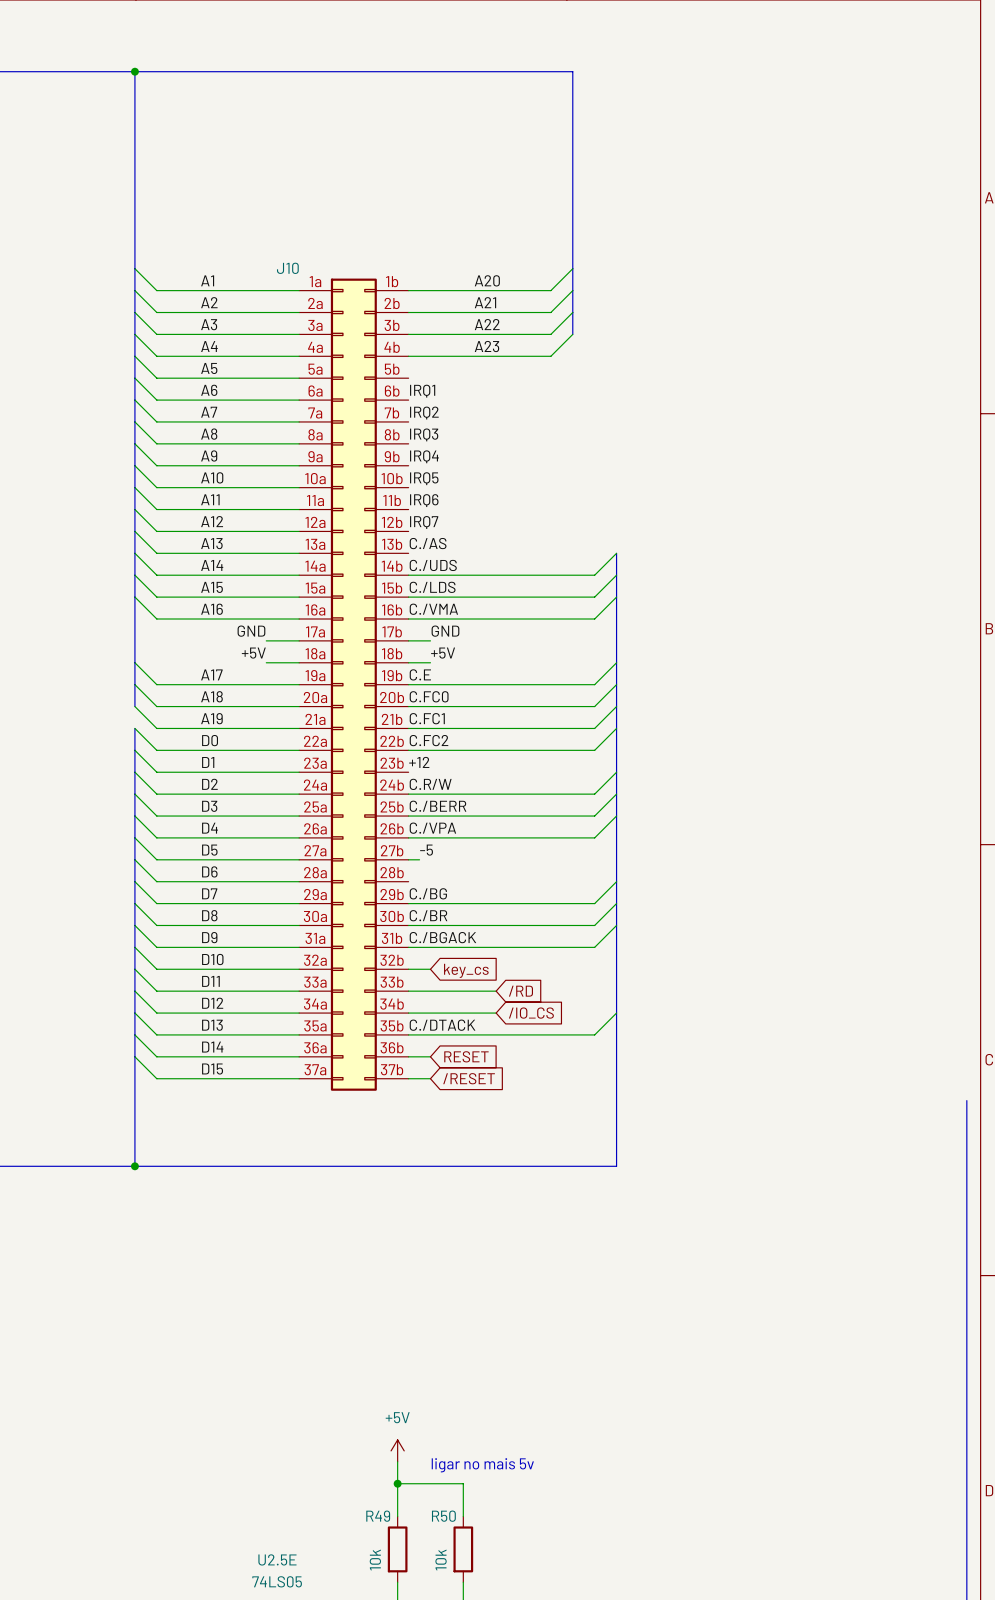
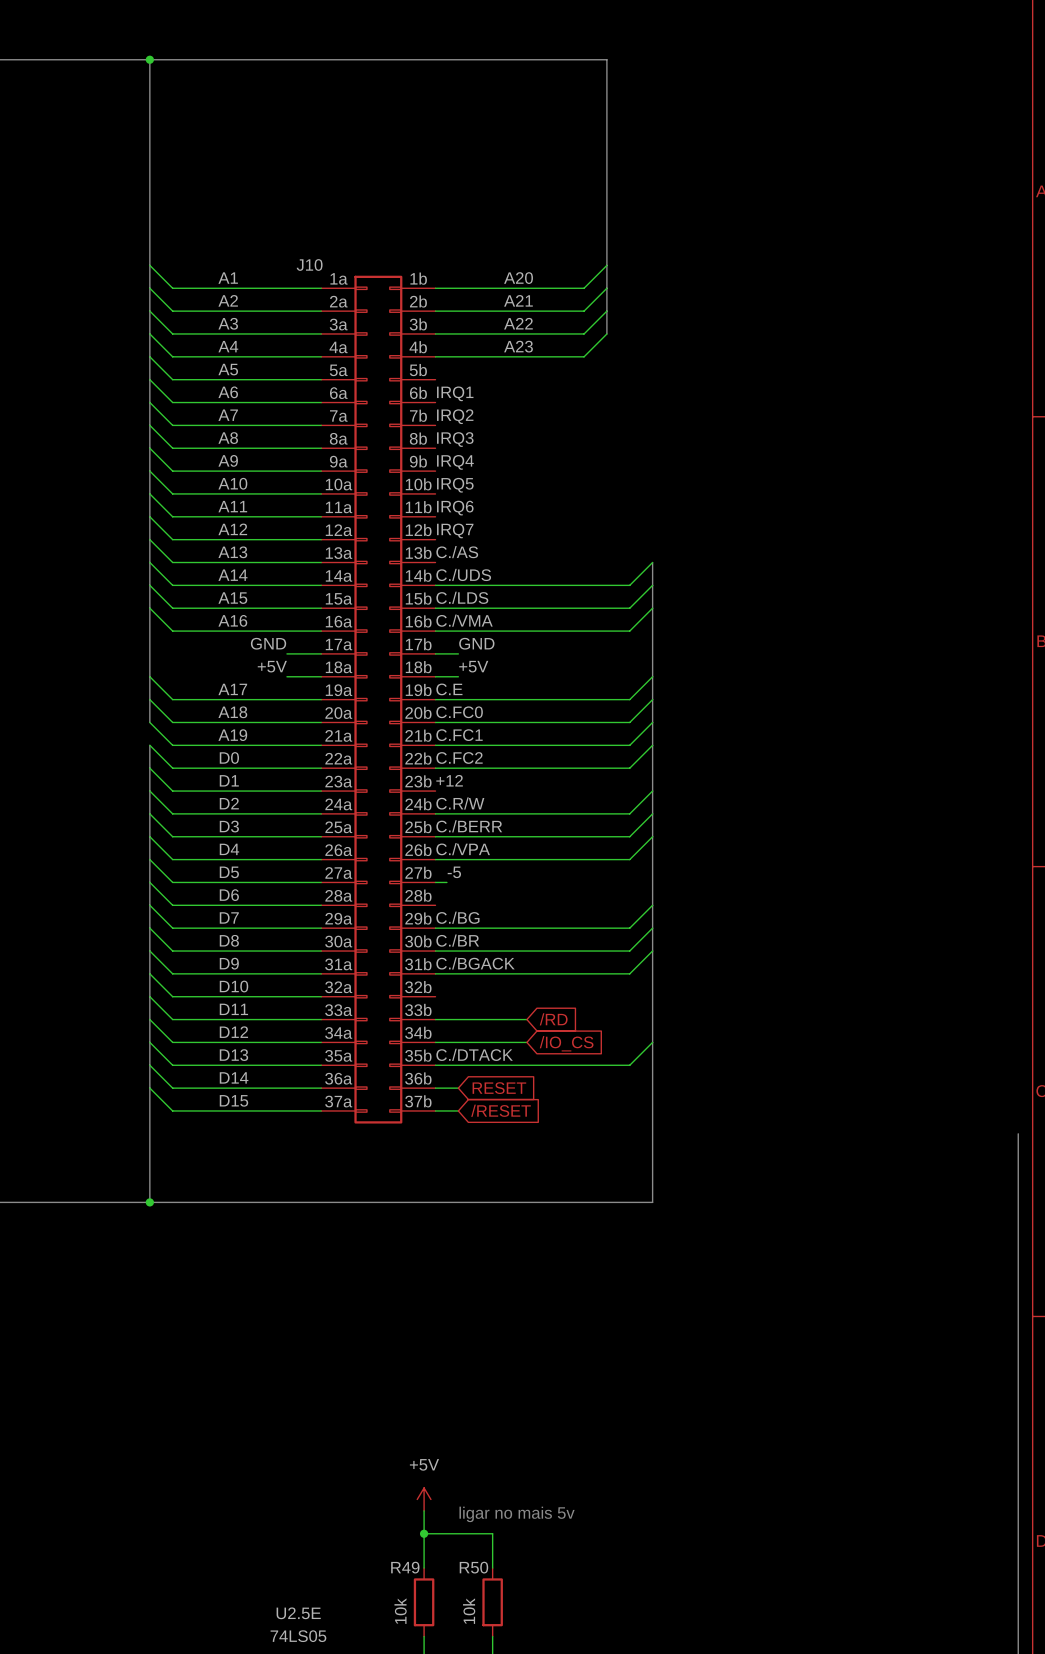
wire: (408, 969) (430, 969) -> none
global label: key_cs (466, 970) -> none

